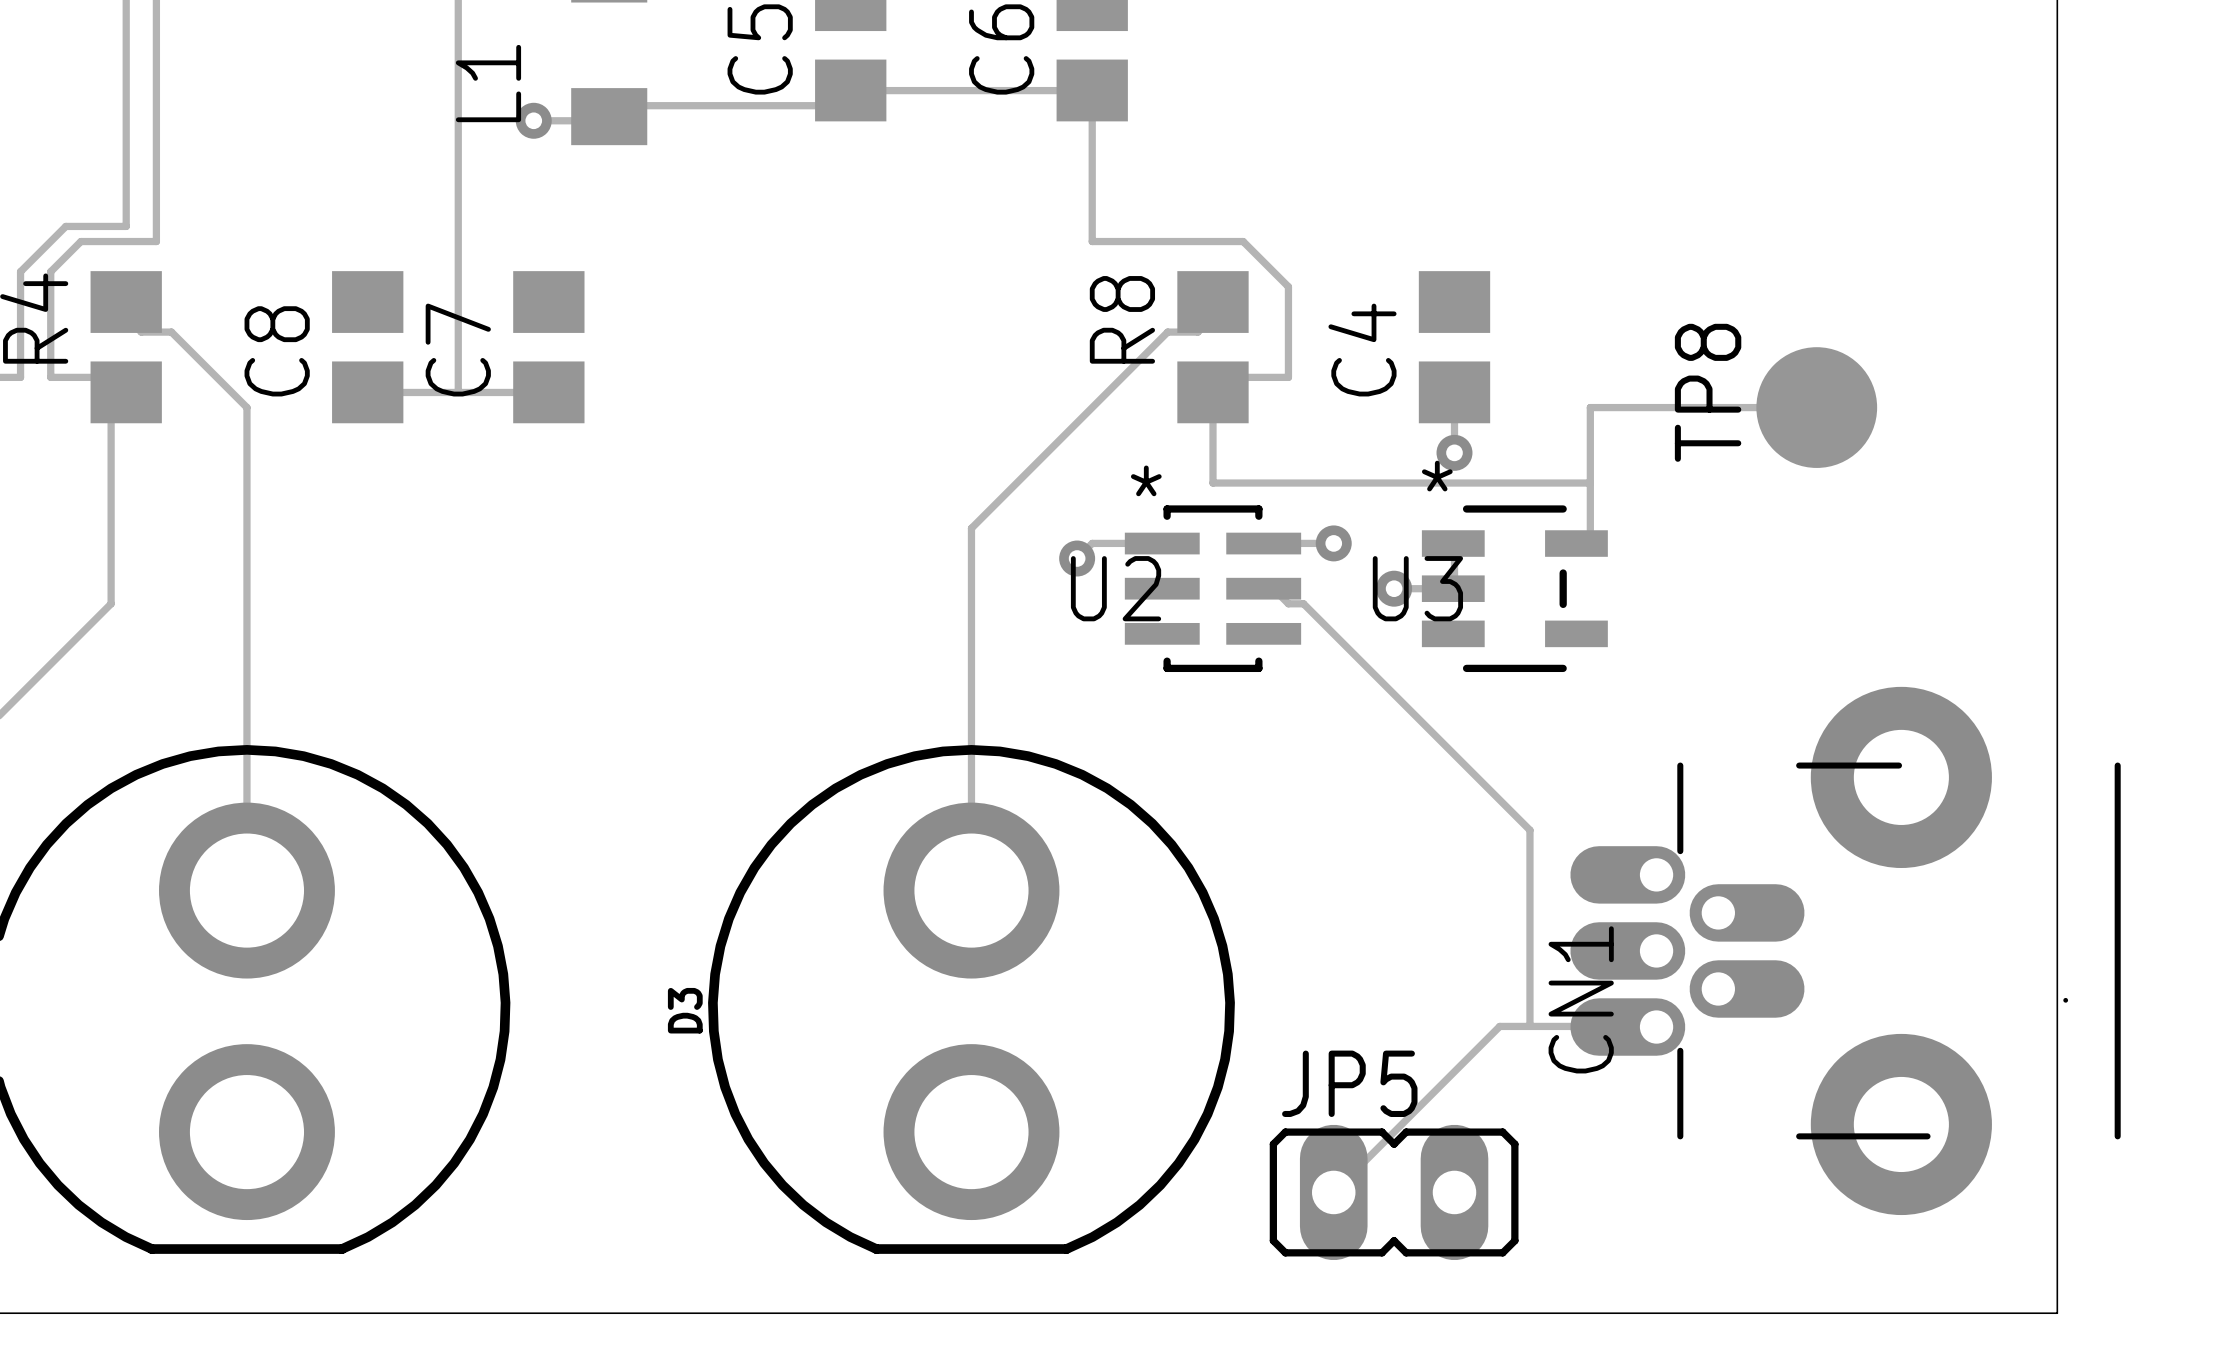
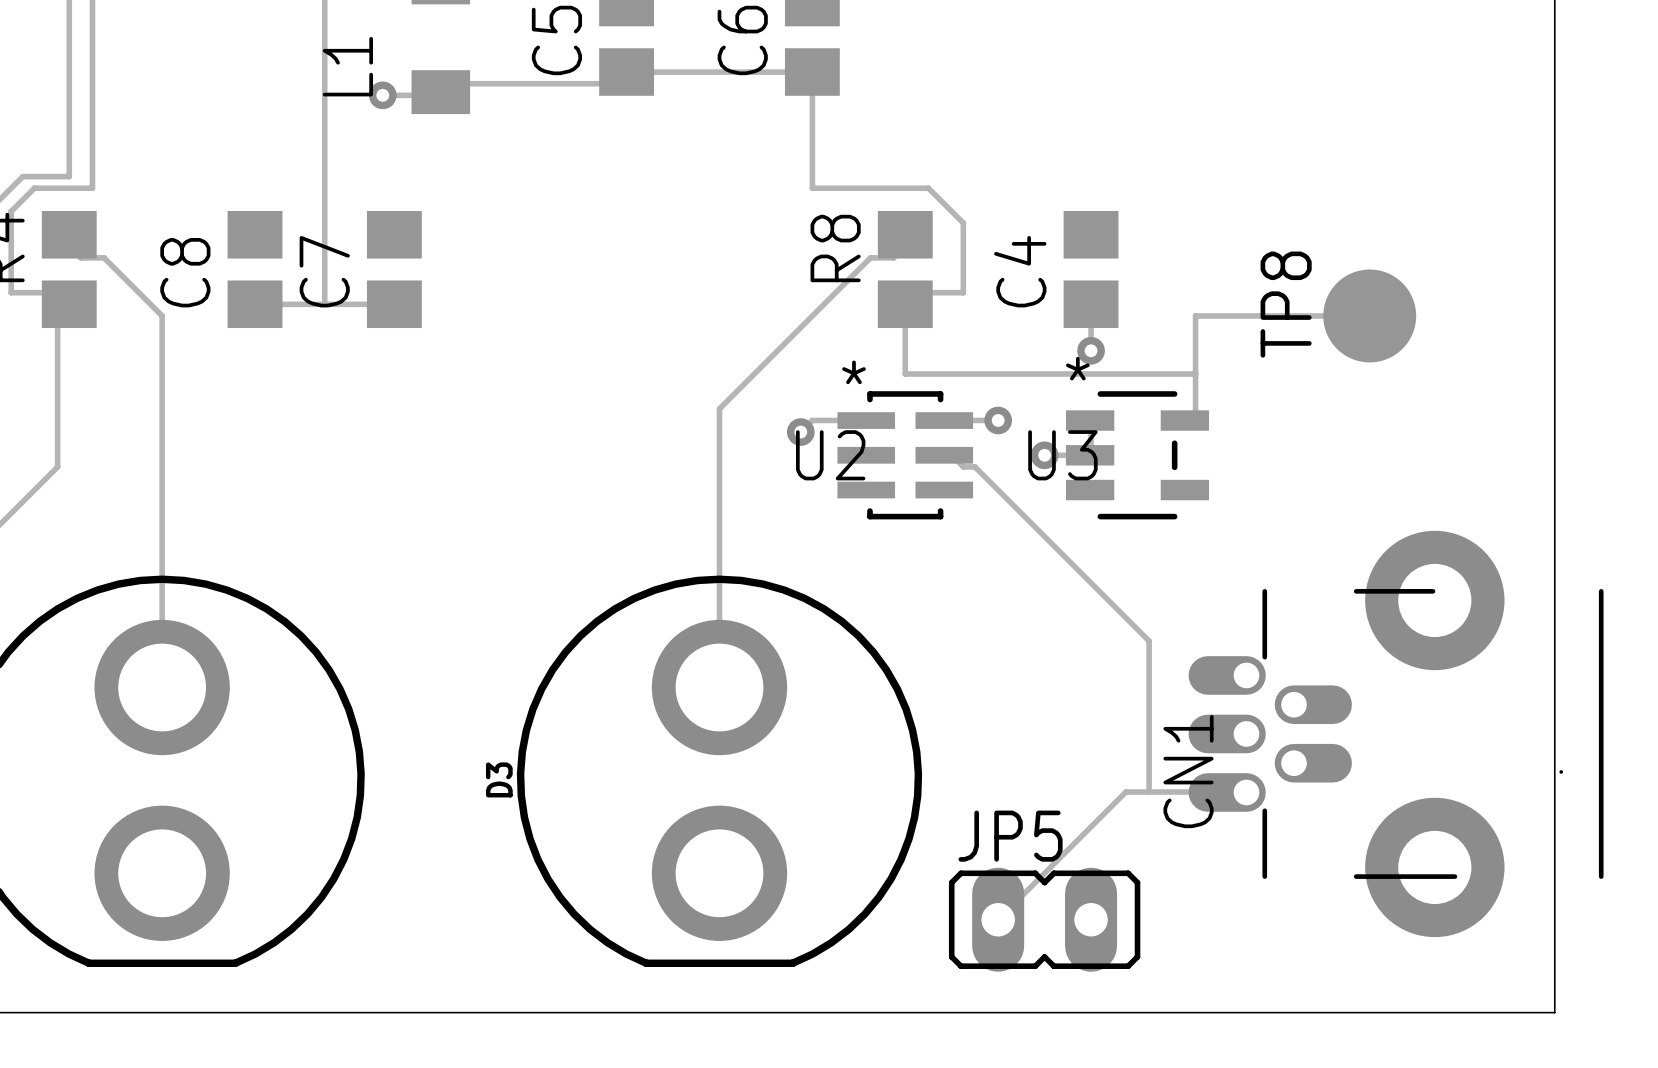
CN1 footprint: [1570, 686, 2121, 1216] -> [1188, 530, 1604, 938]

